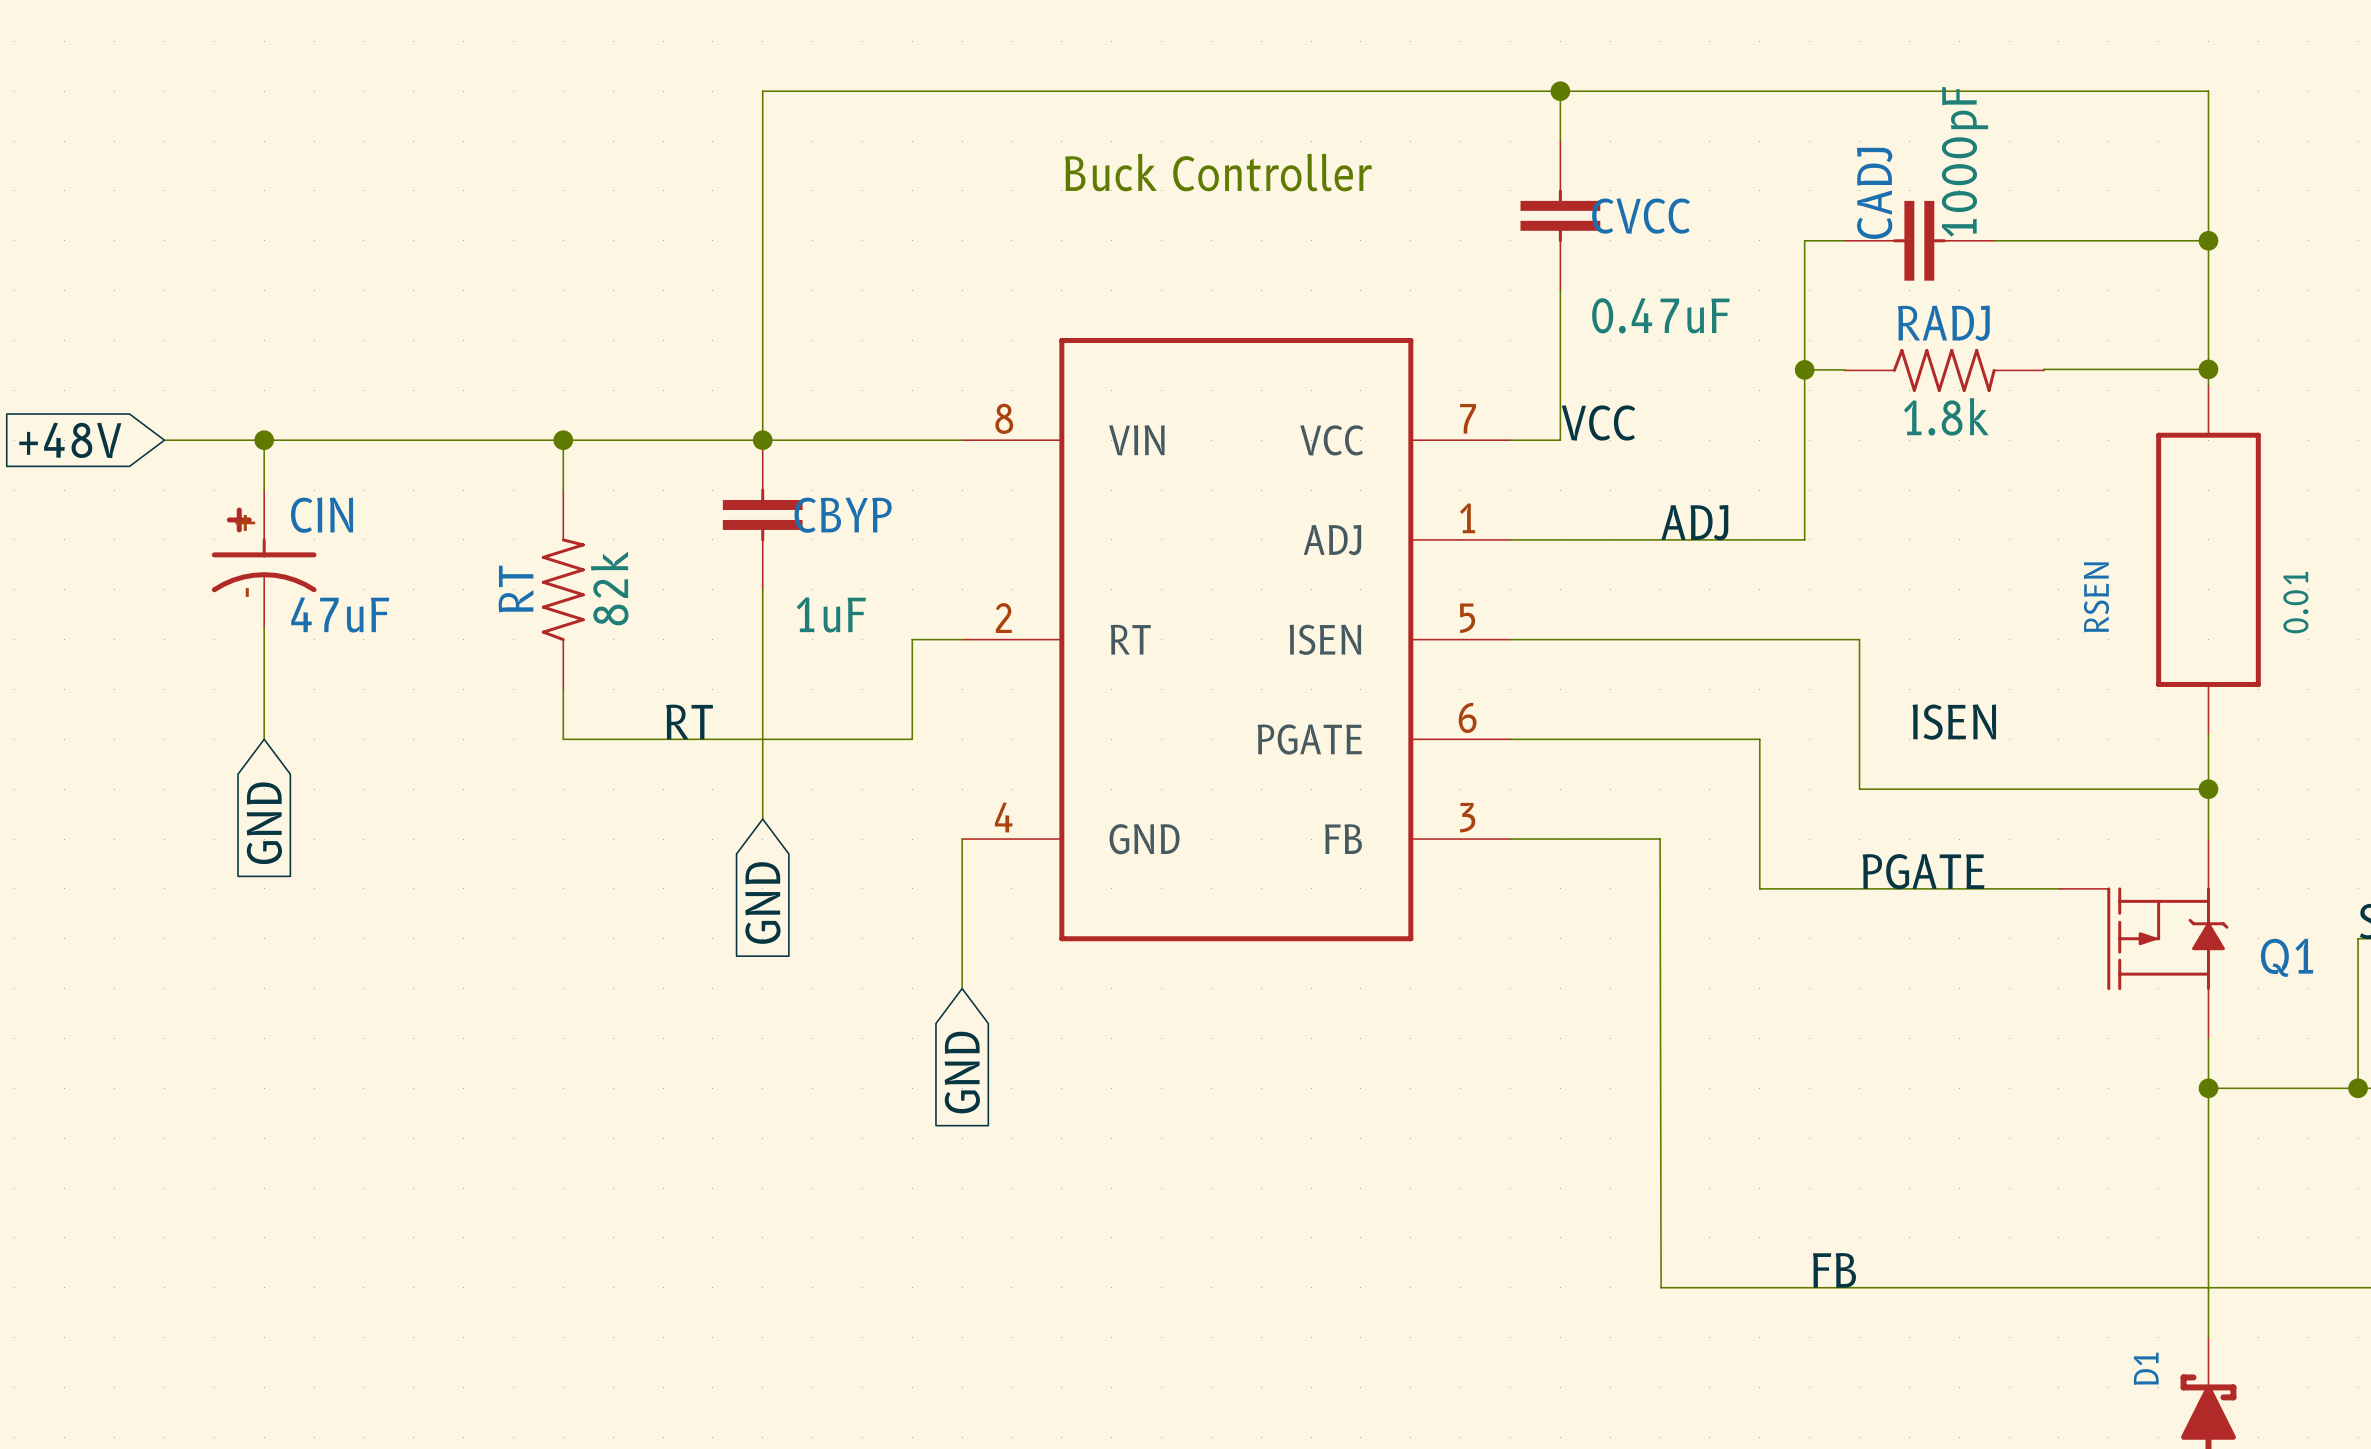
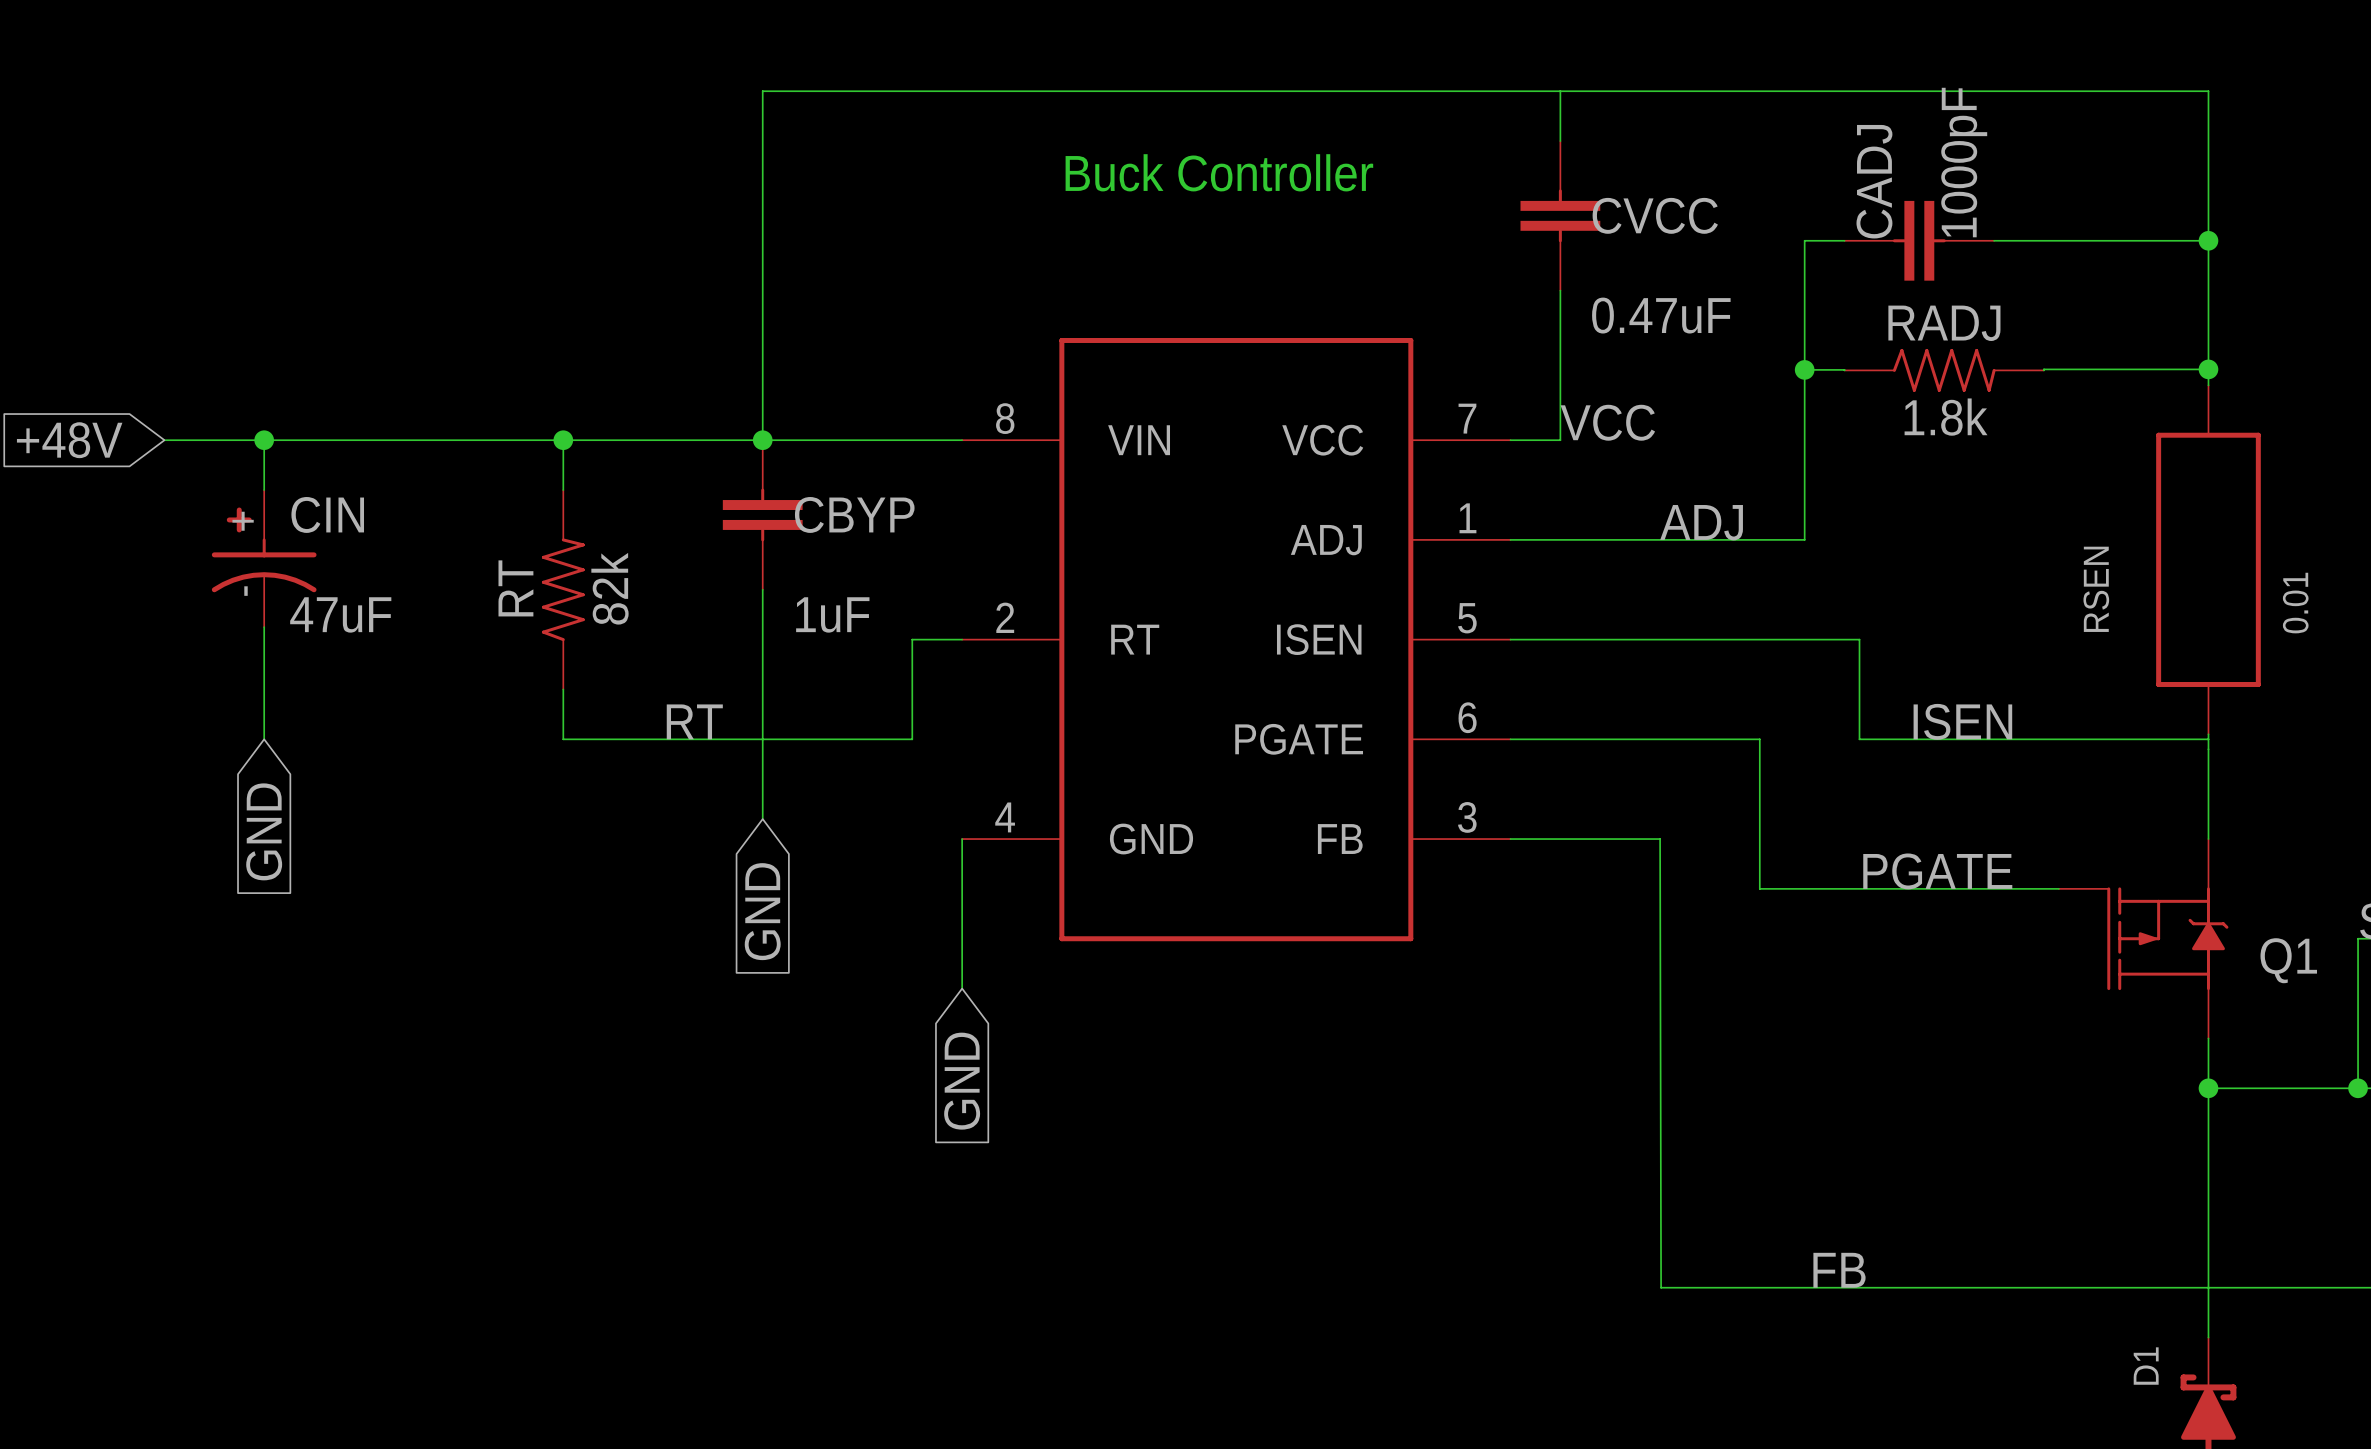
junction: (1560, 91) -> none
wire: (1859, 739) (1859, 789) (2208, 789) -> (1859, 739) (2208, 739)
junction: (2208, 789) -> none

